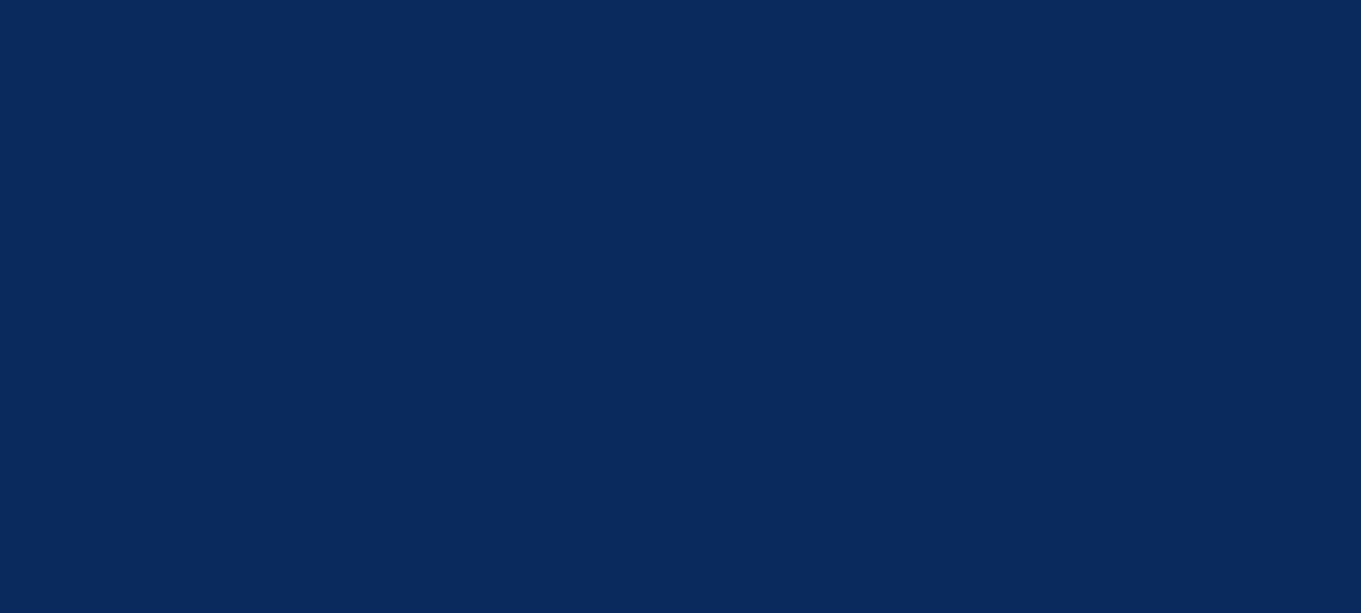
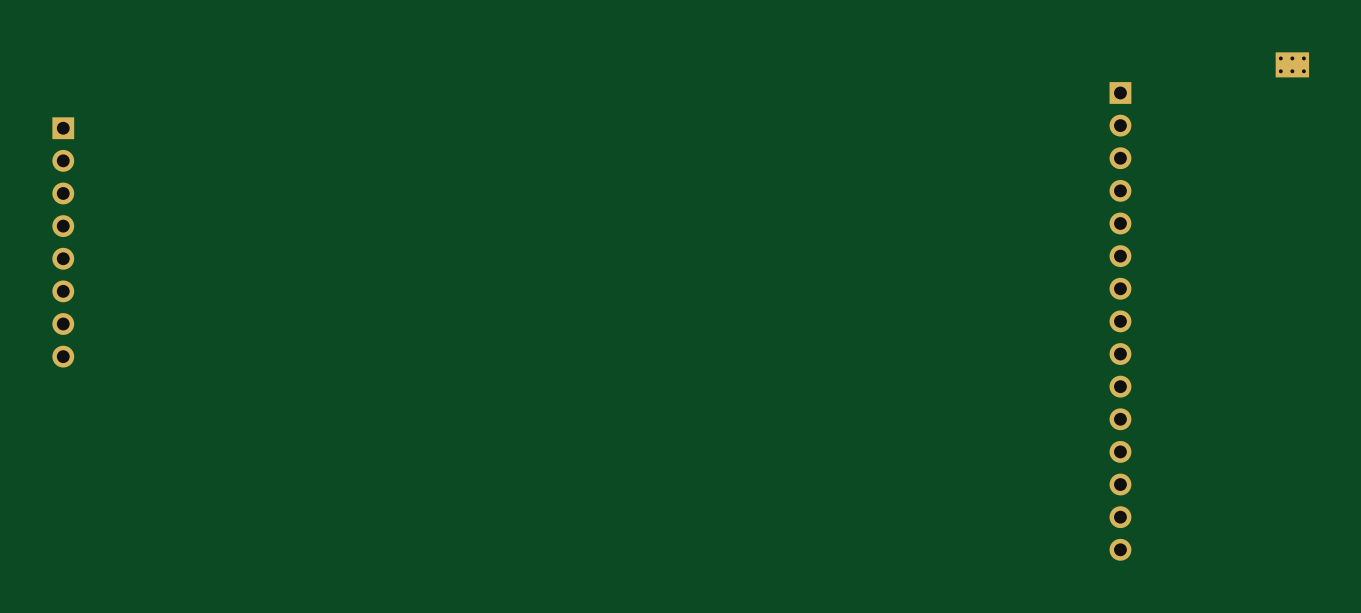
part: none -> (1292, 64)
part: none -> (63, 242)
part: none -> (1120, 321)

